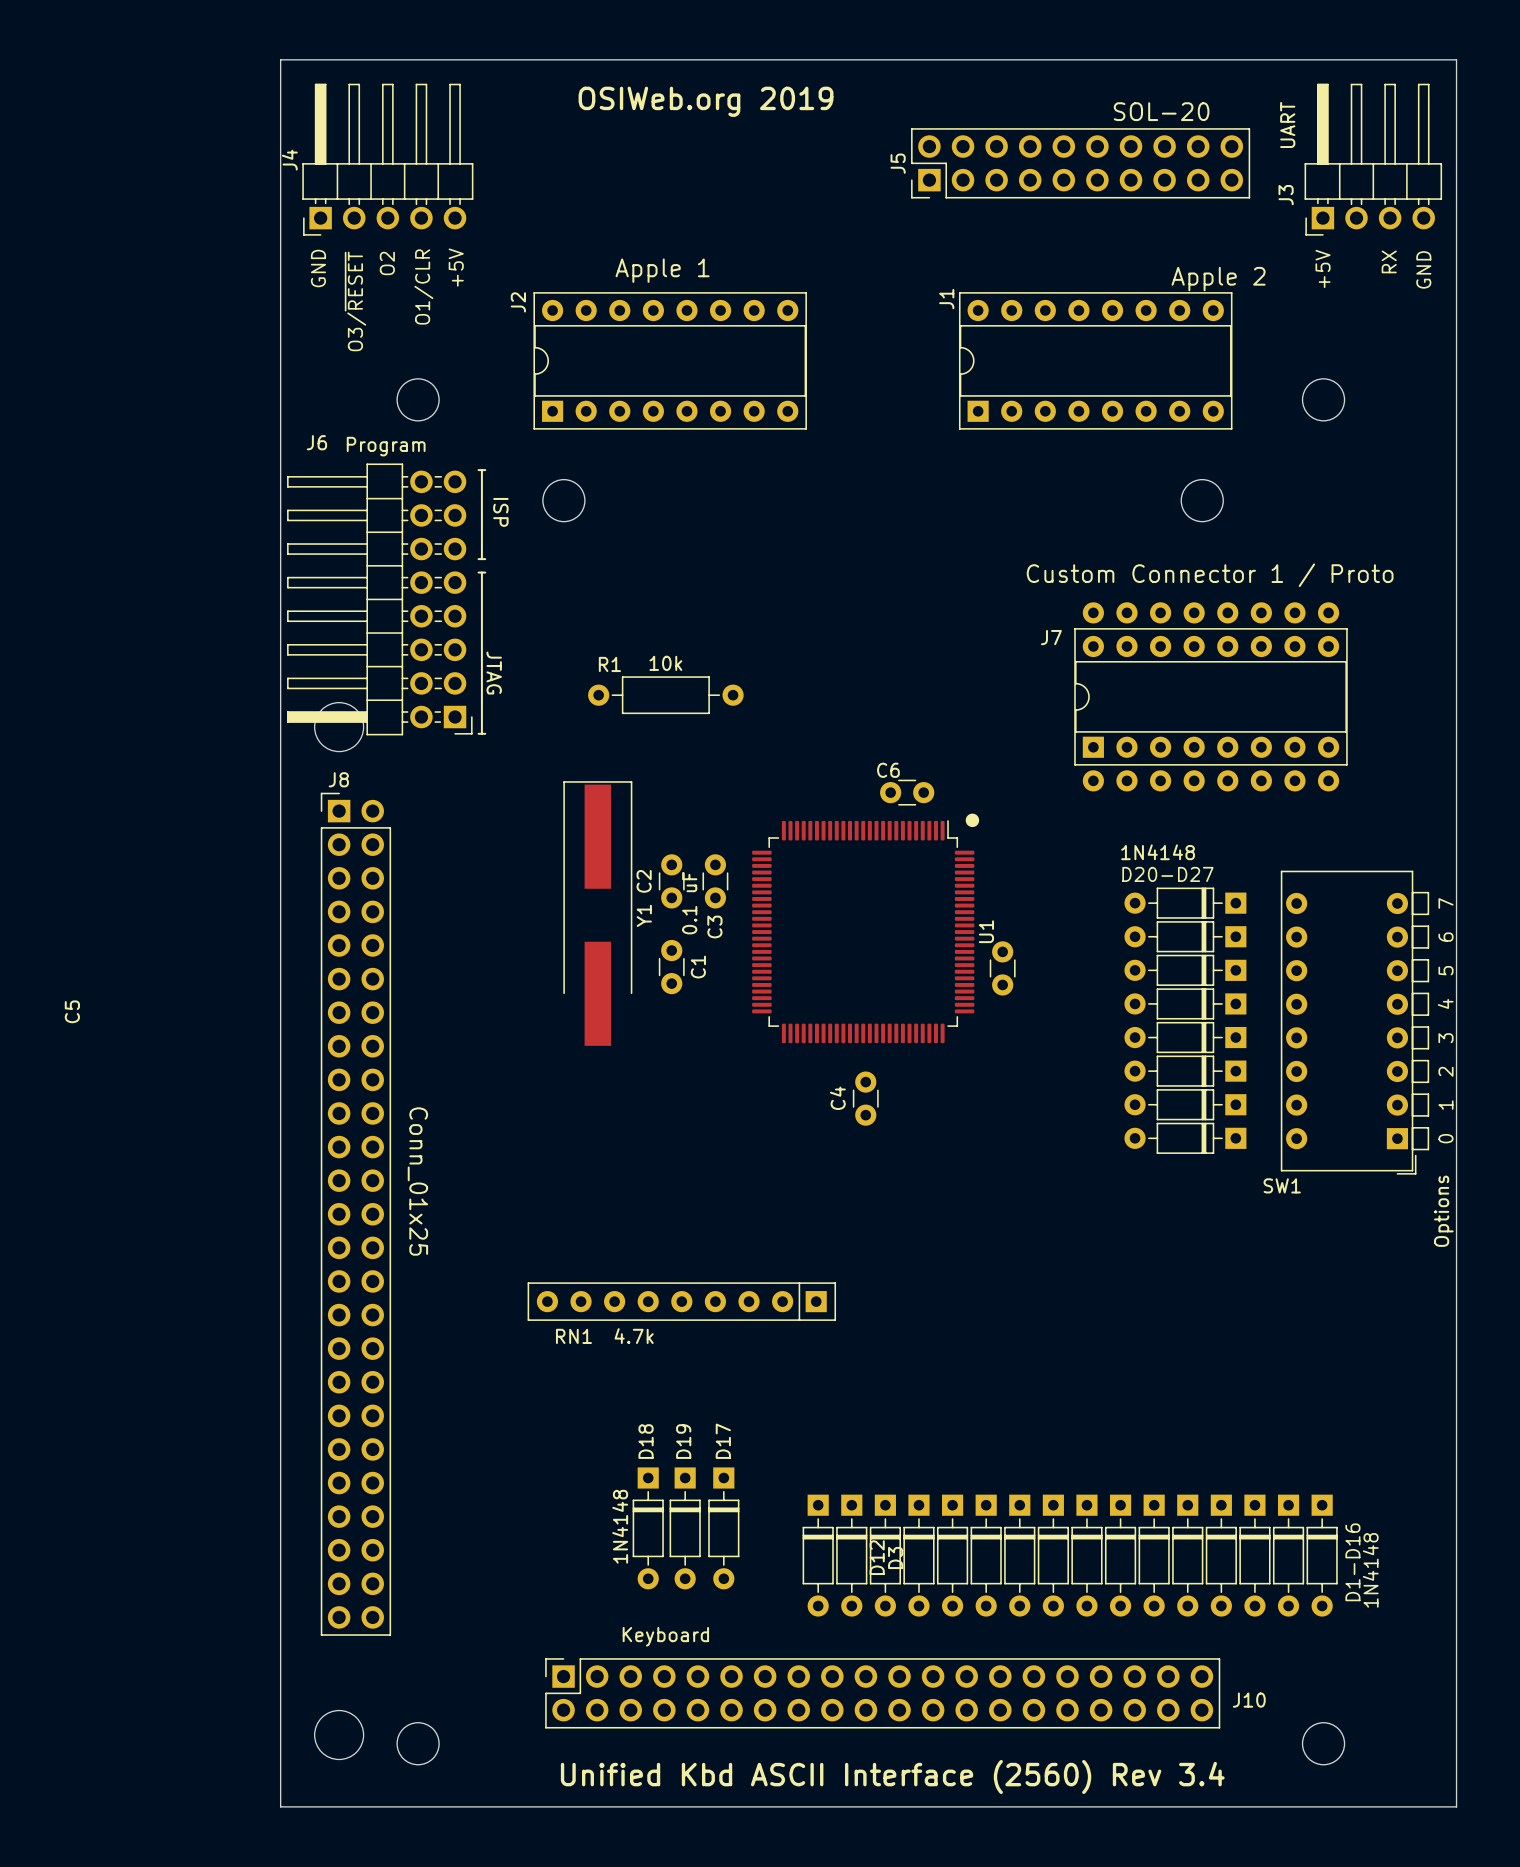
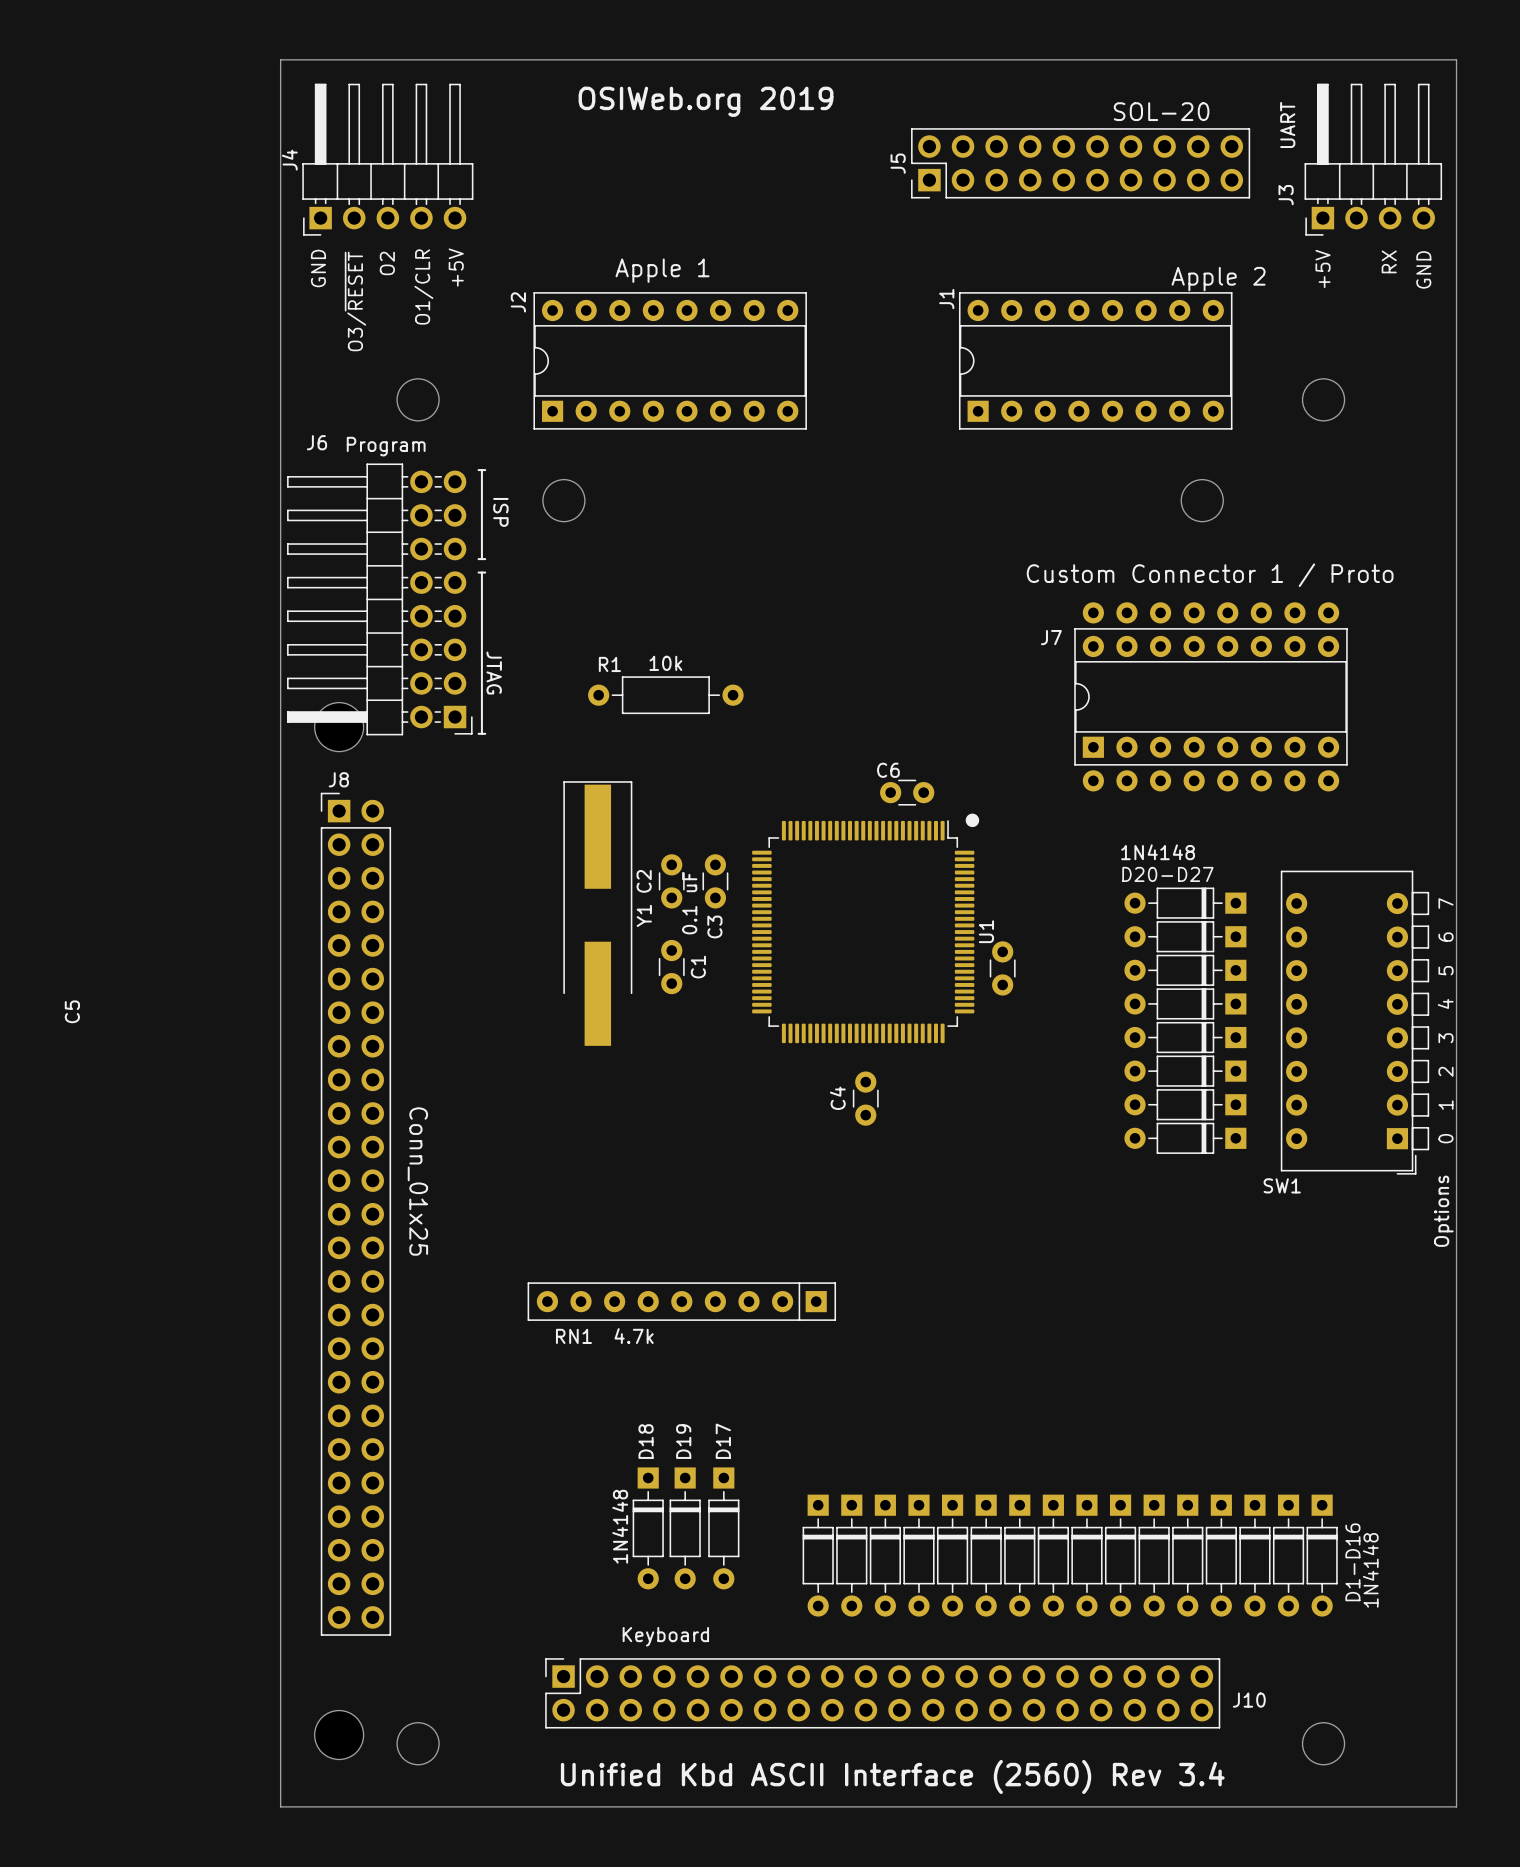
D12 name: D12 (877, 1557) -> none
D3 name: D3 (895, 1557) -> none

